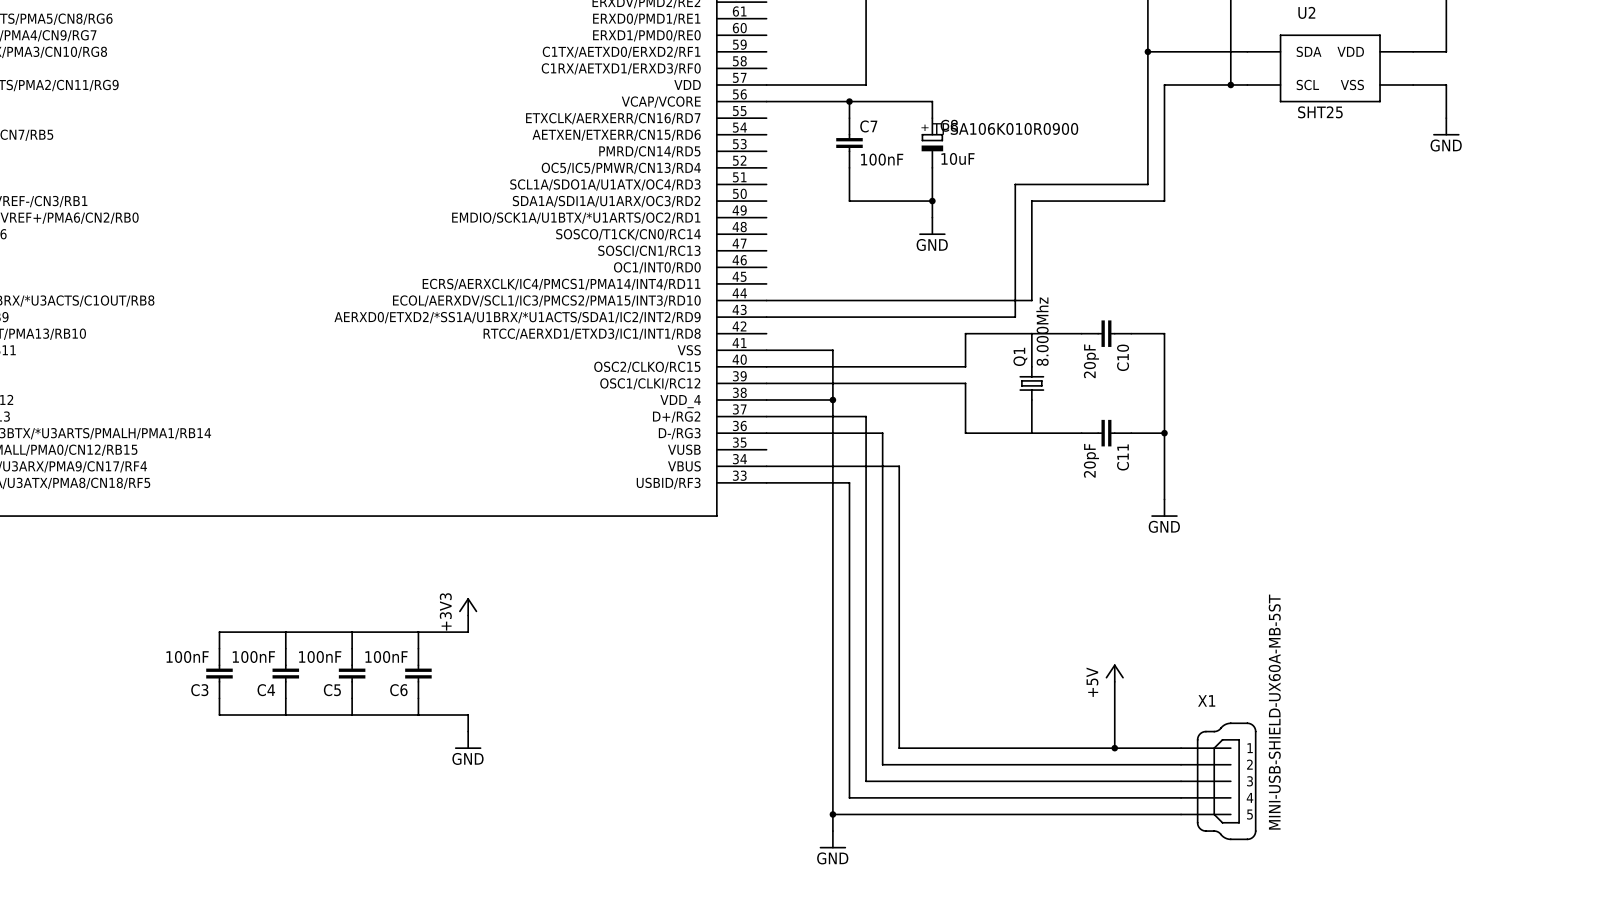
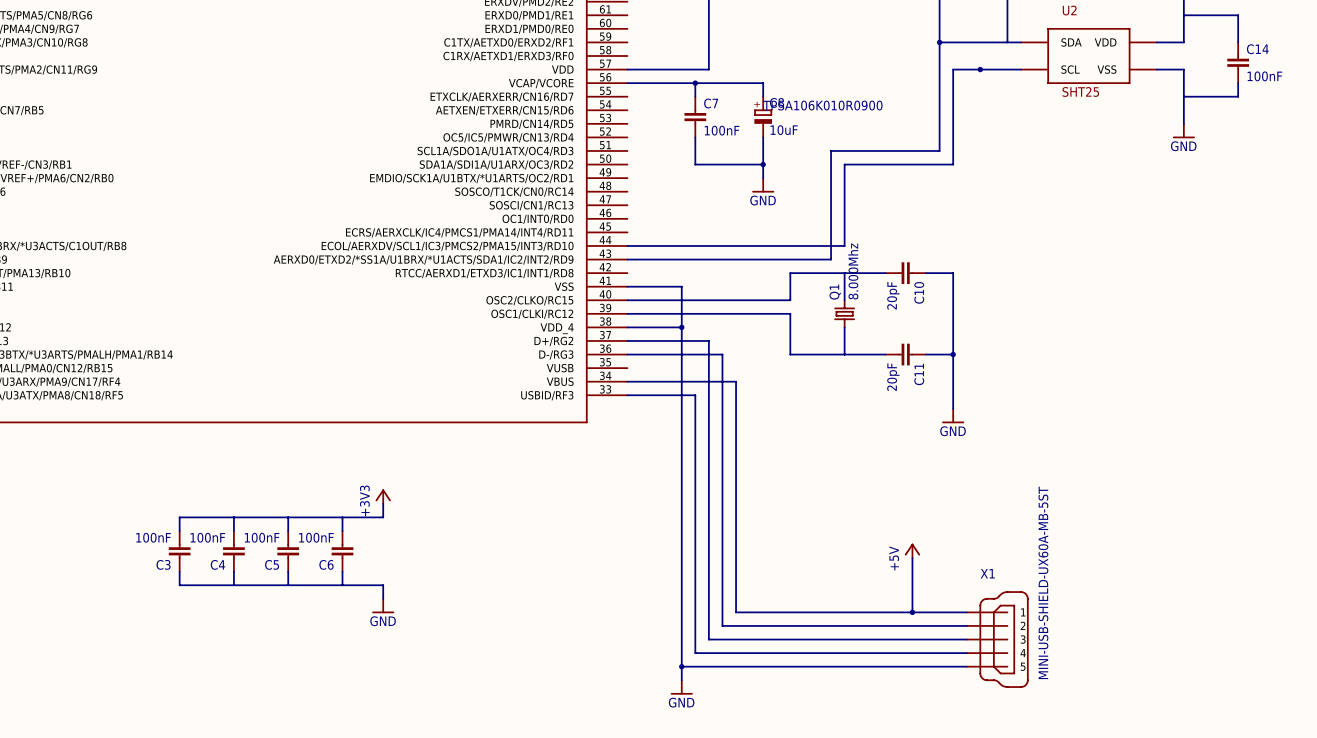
wire: none -> (1183, 15) (1238, 15) (1238, 42)
wire: (1230, 51) (1230, 84) -> none
C14: none -> 100nF (1238, 62)
junction position: (1230, 84) -> (980, 69)
wire: none -> (1238, 83) (1238, 96) (1183, 96) (1183, 123)
power symbol position: GND (1446, 126) -> GND (1183, 130)

